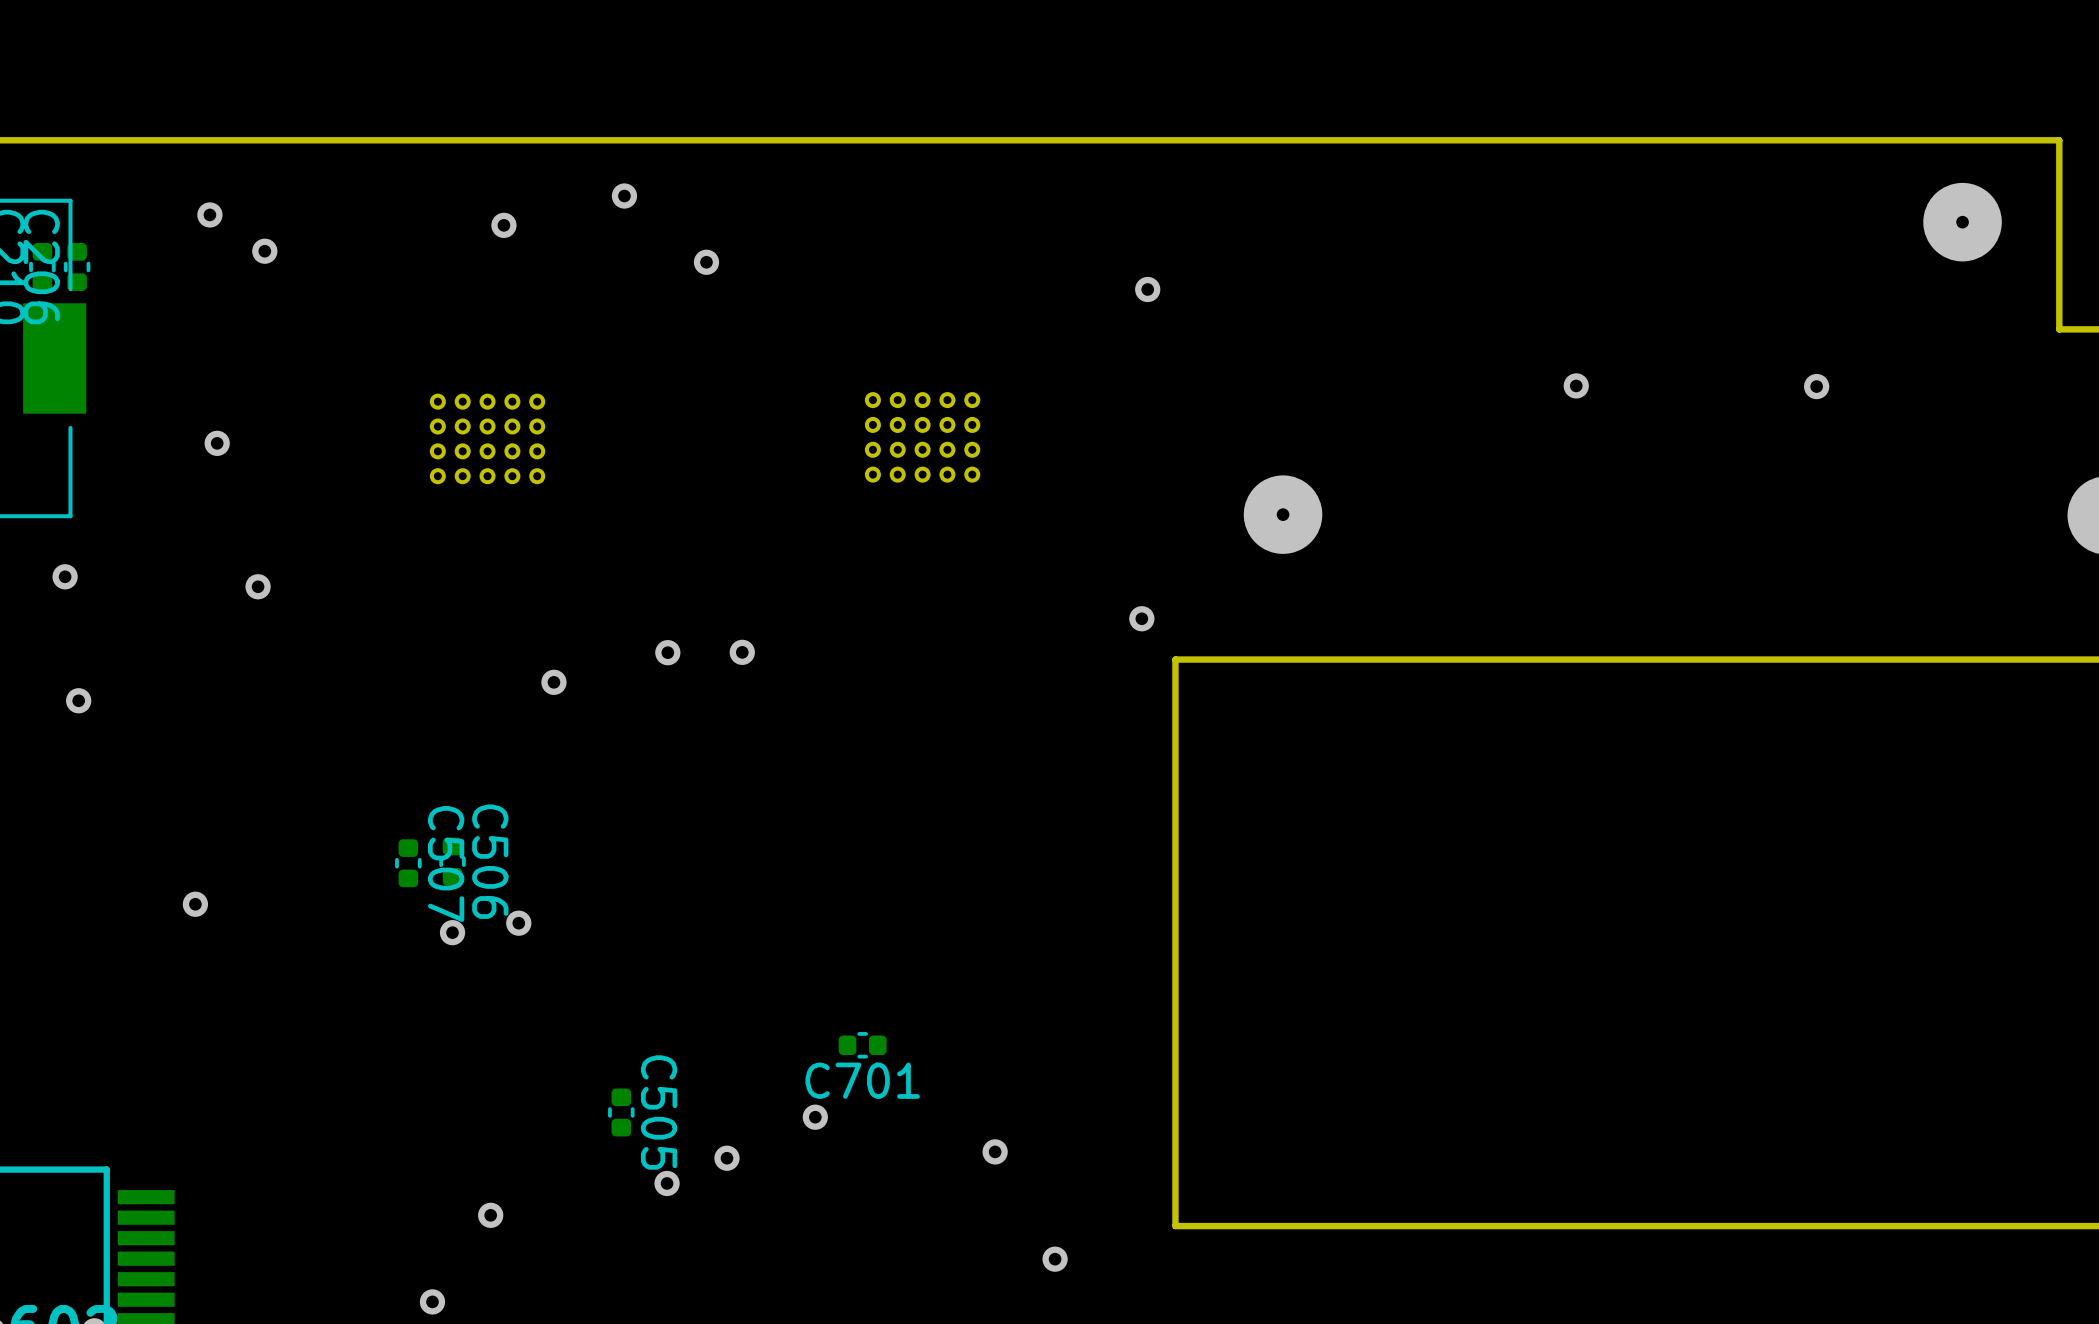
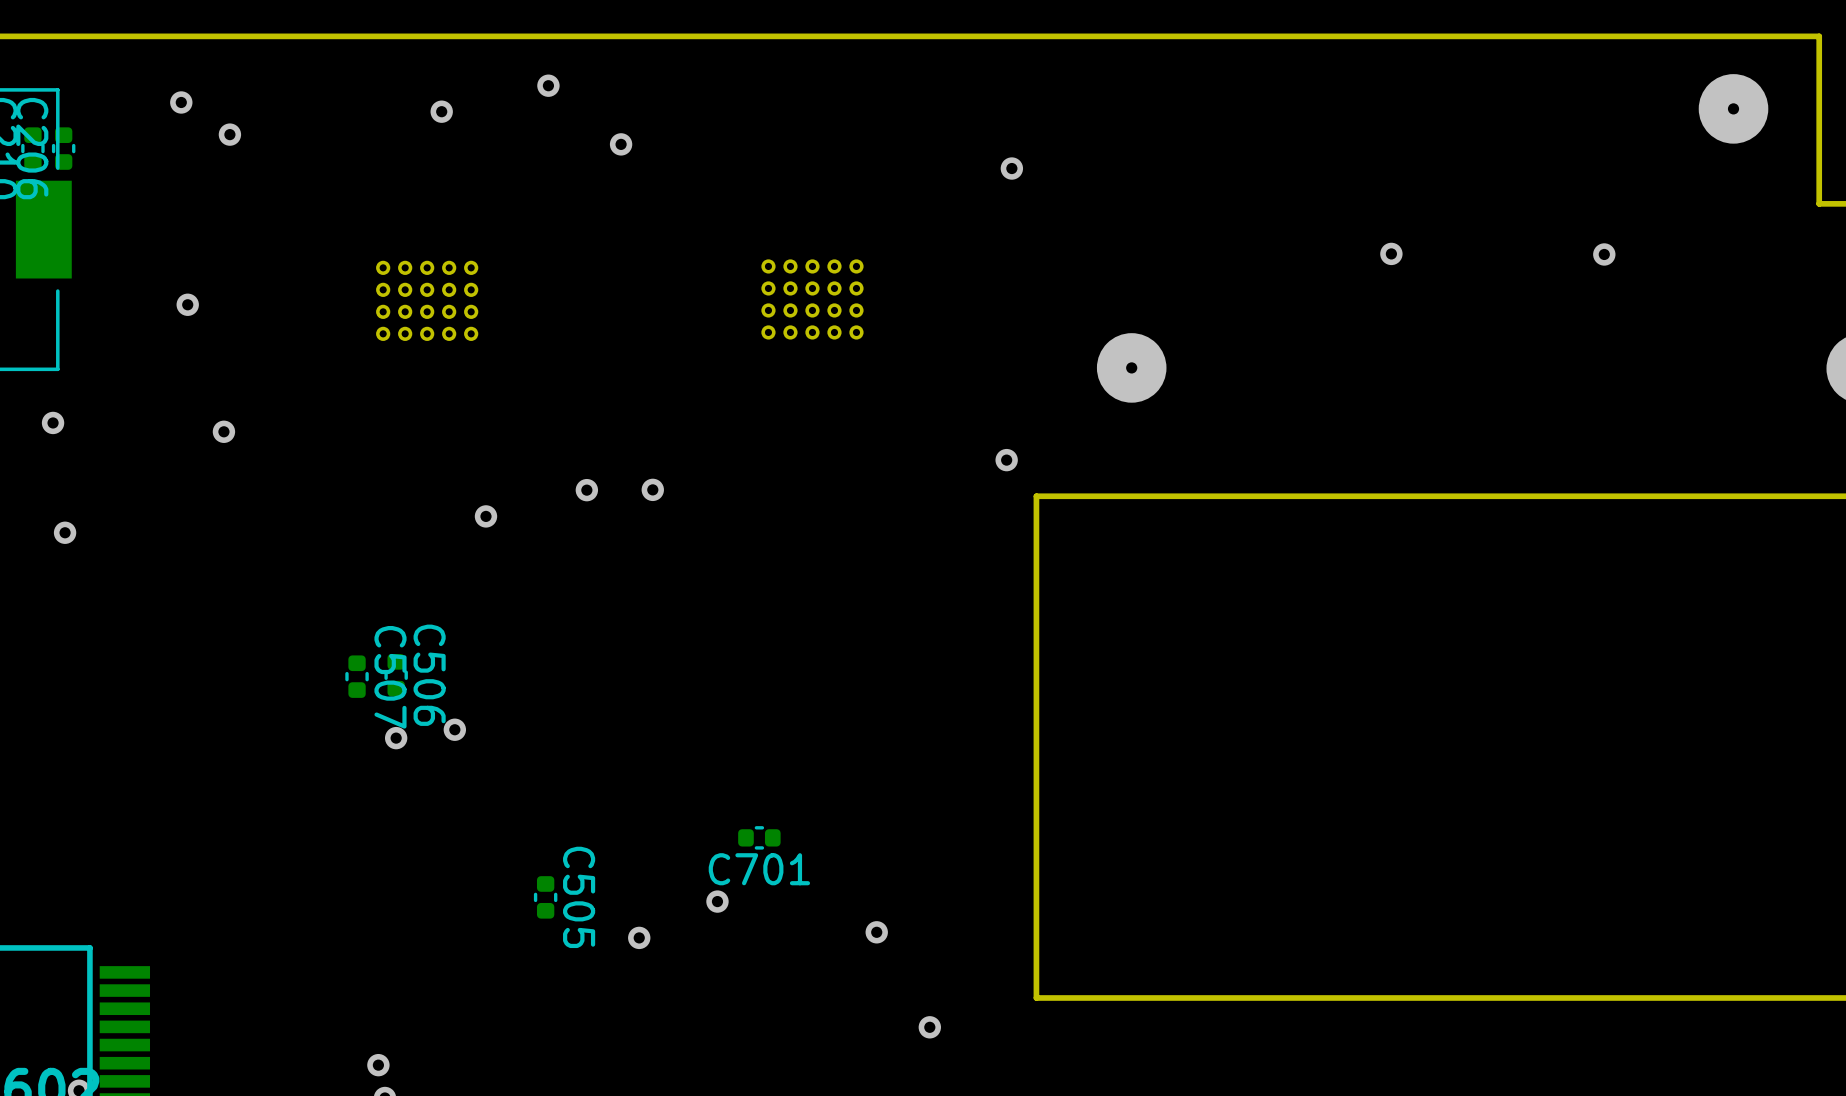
via: (195, 904) -> none
via: (667, 1183) -> none
via: (490, 1215) -> none

